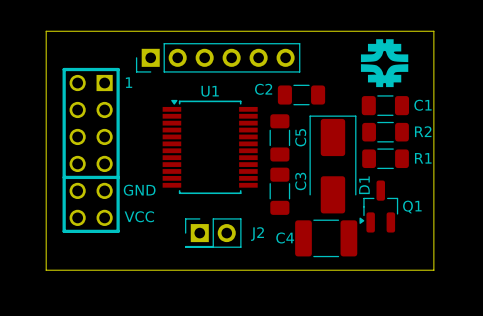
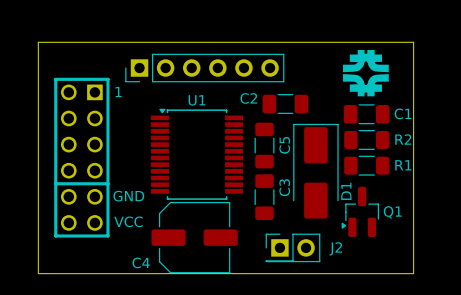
C4 footprint: [295, 219, 358, 258] -> [151, 201, 238, 274]
J2 position: (213, 233) -> (292, 247)
C4 name position: C4 (285, 237) -> C4 (141, 262)

